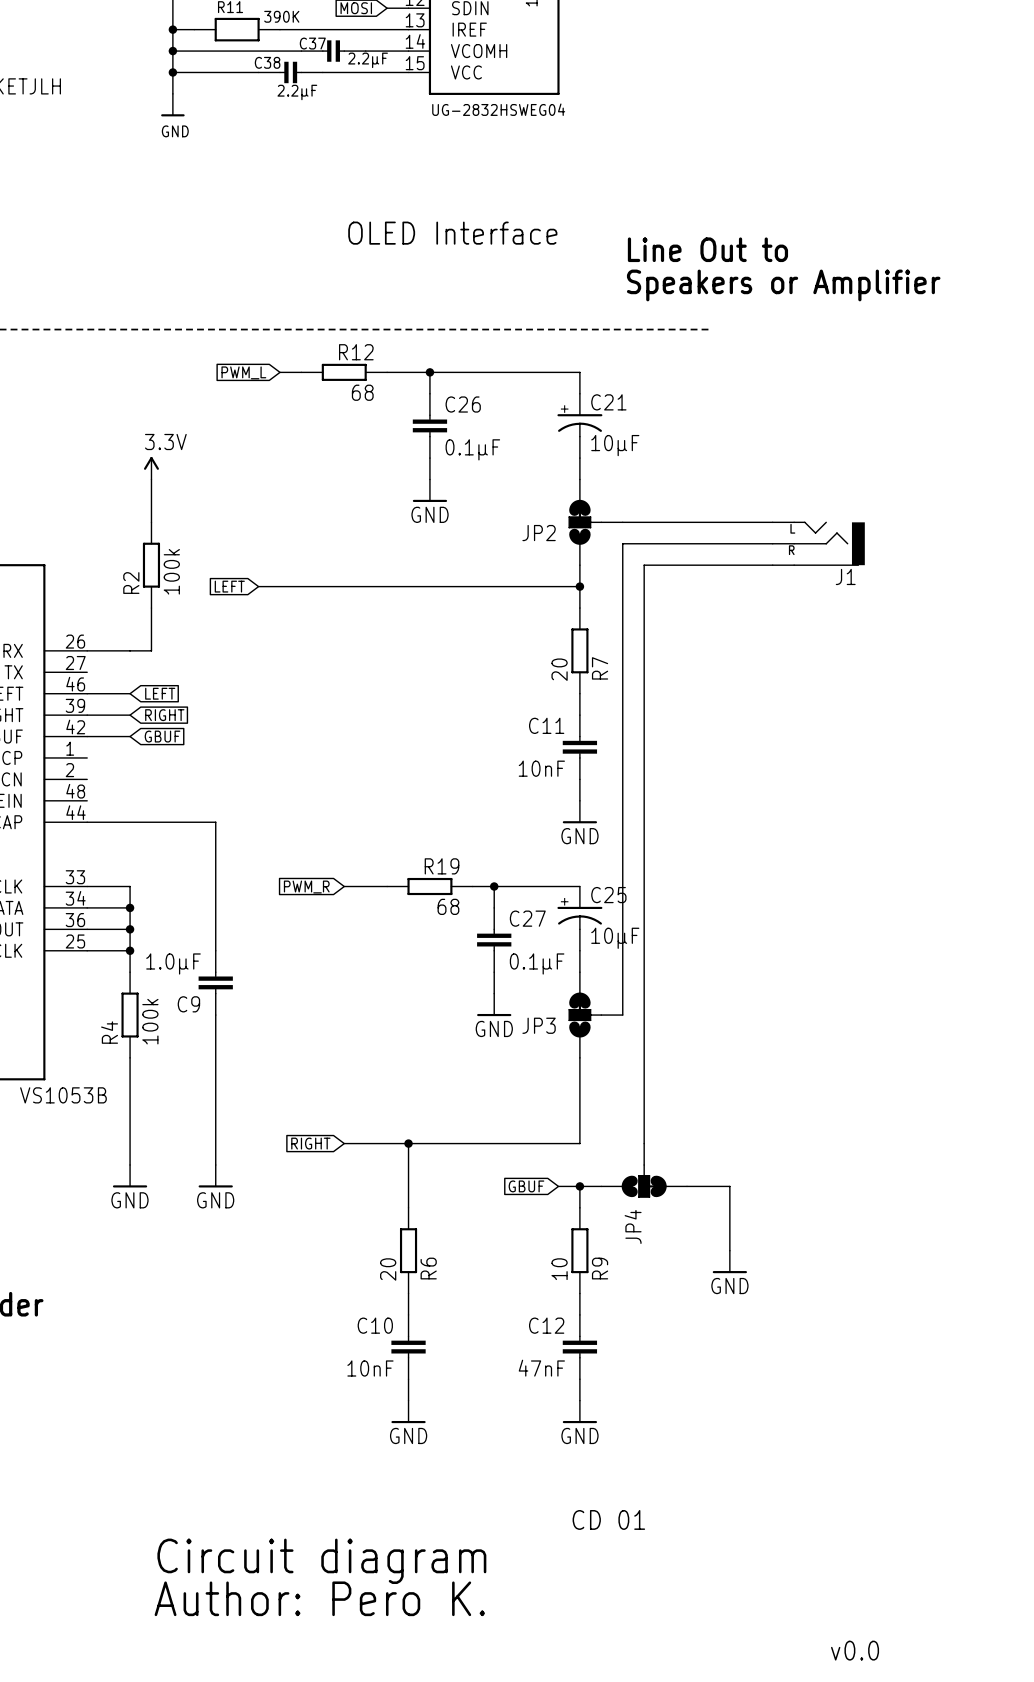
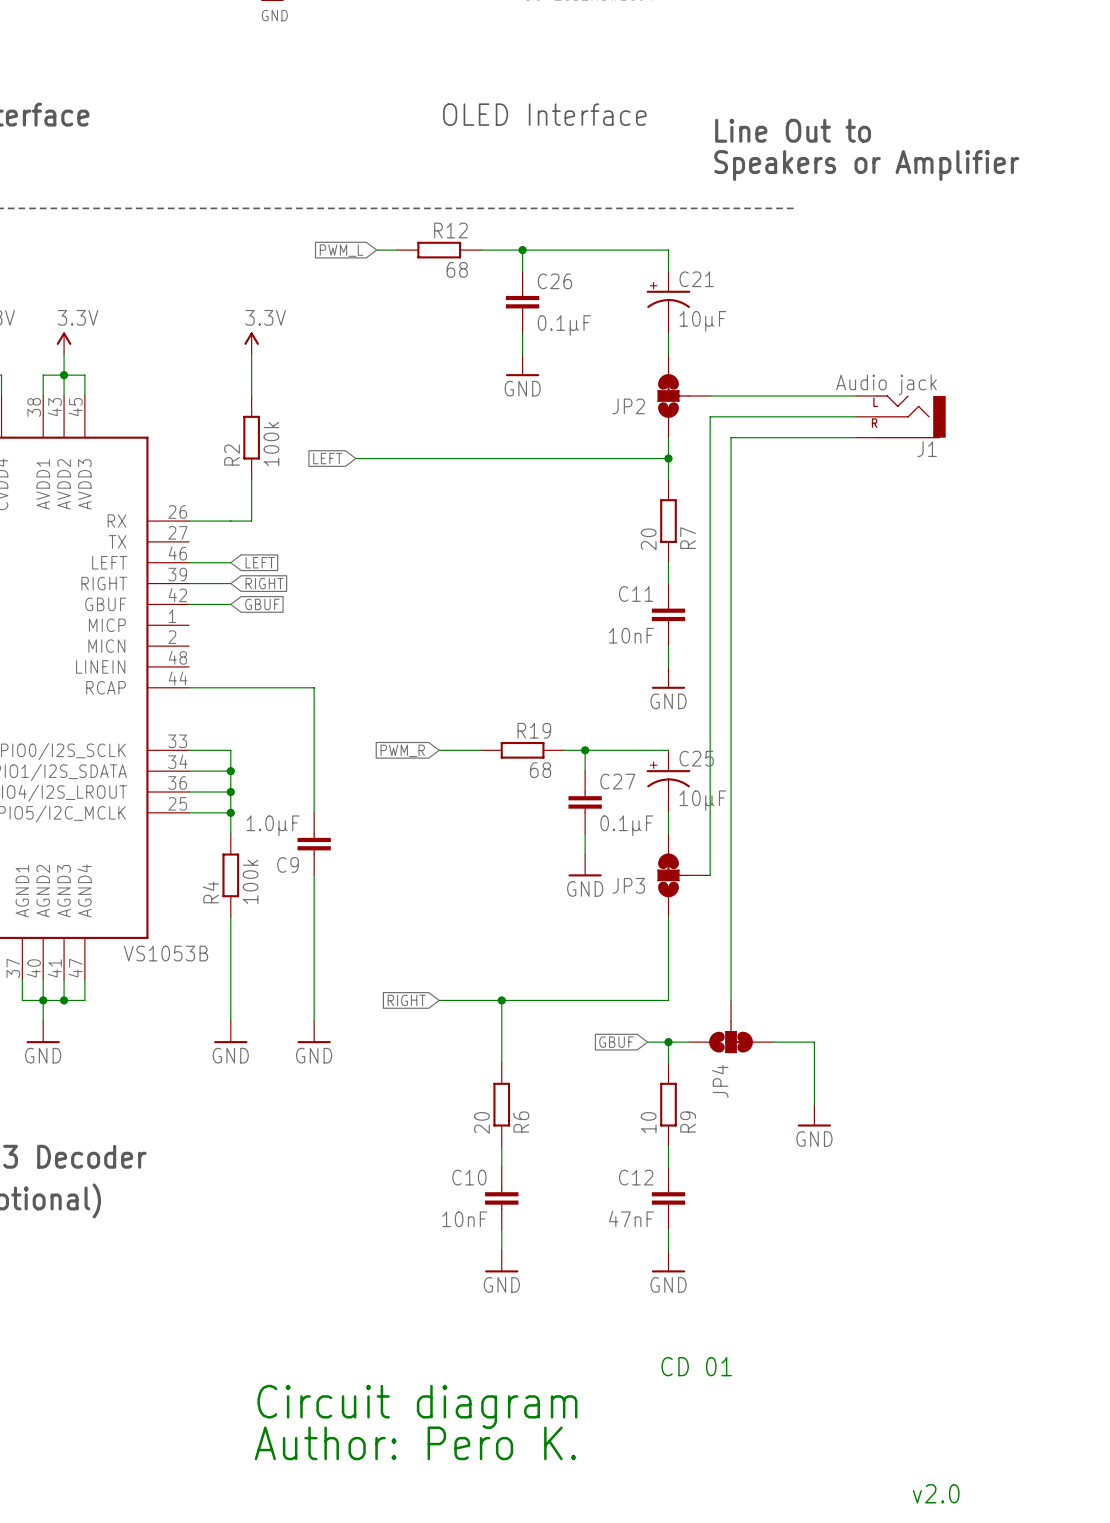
J1 value: none -> Audio jack (886, 384)
text: v0.0 (855, 1650) -> v2.0 (936, 1493)

